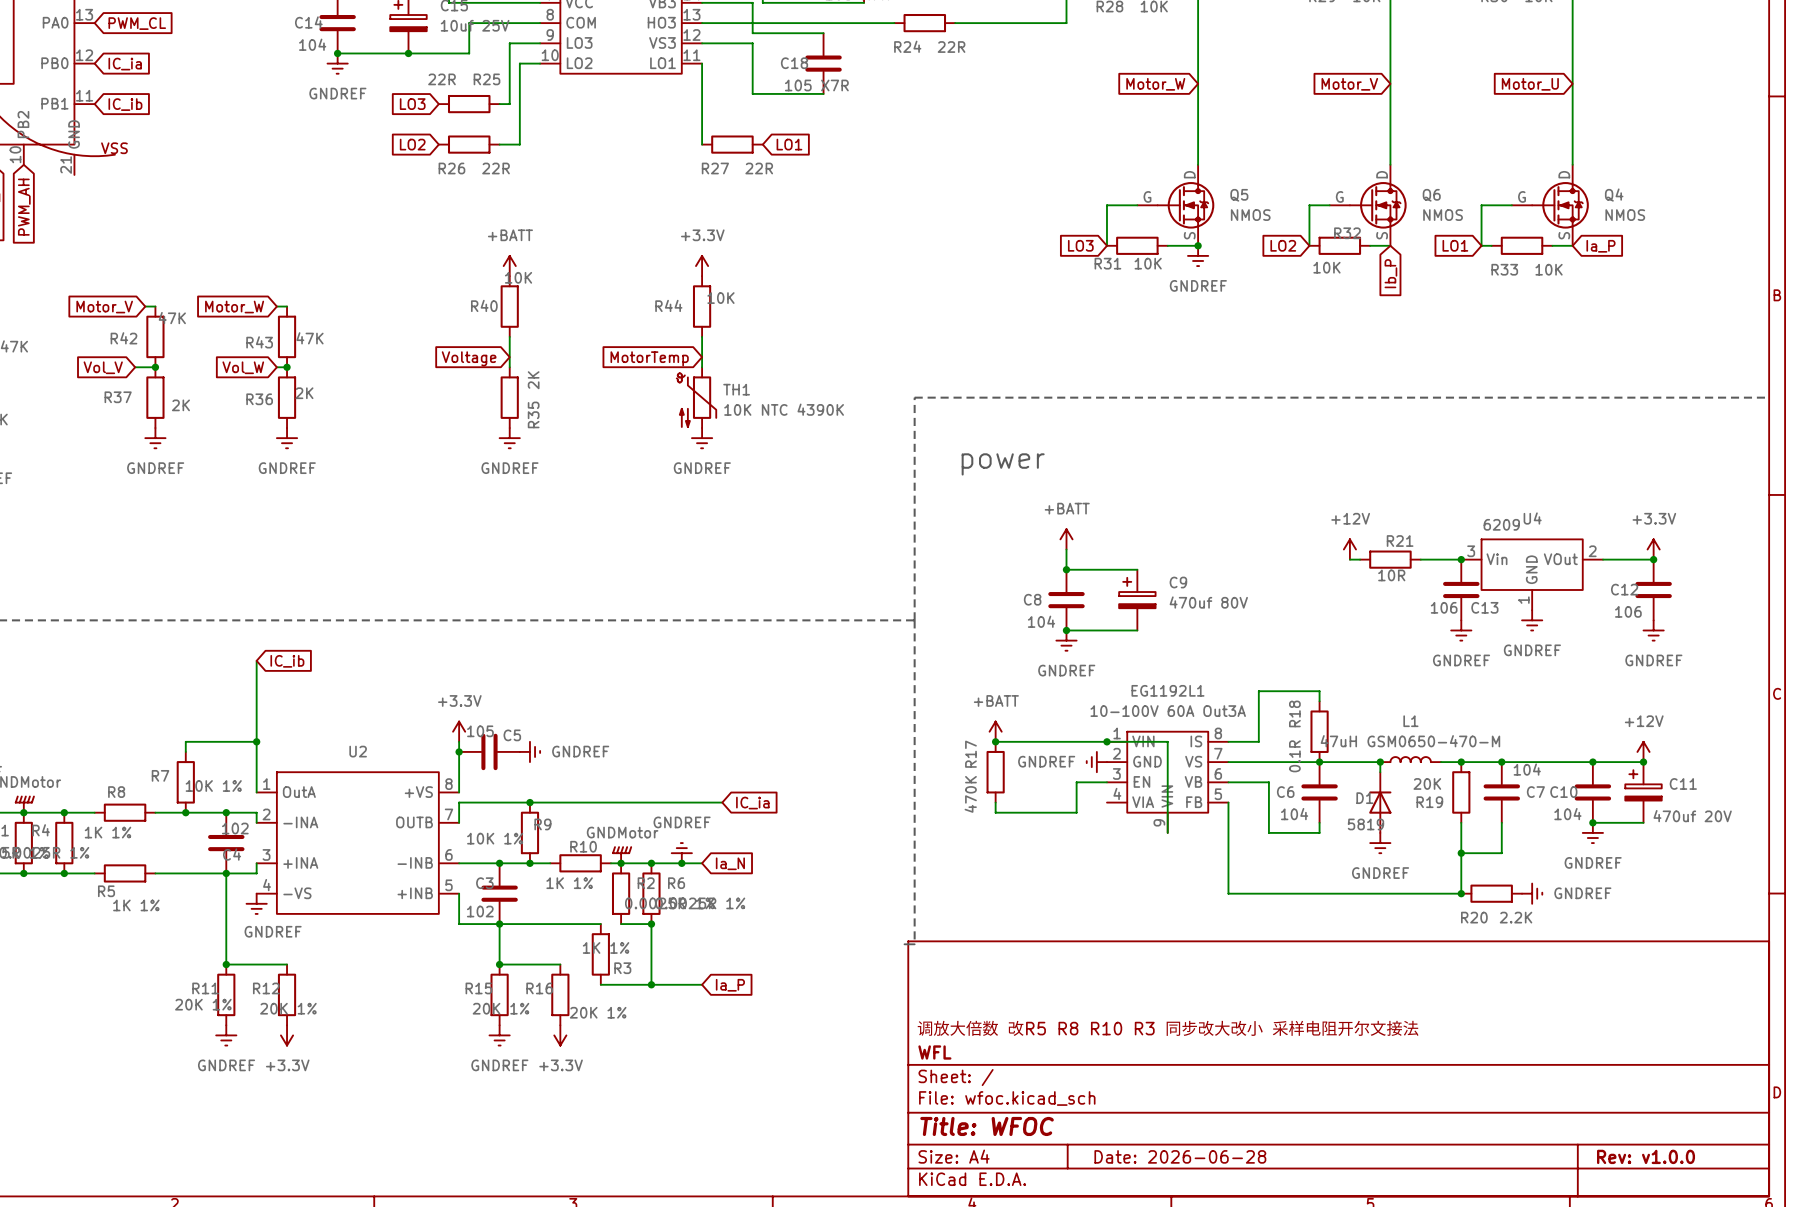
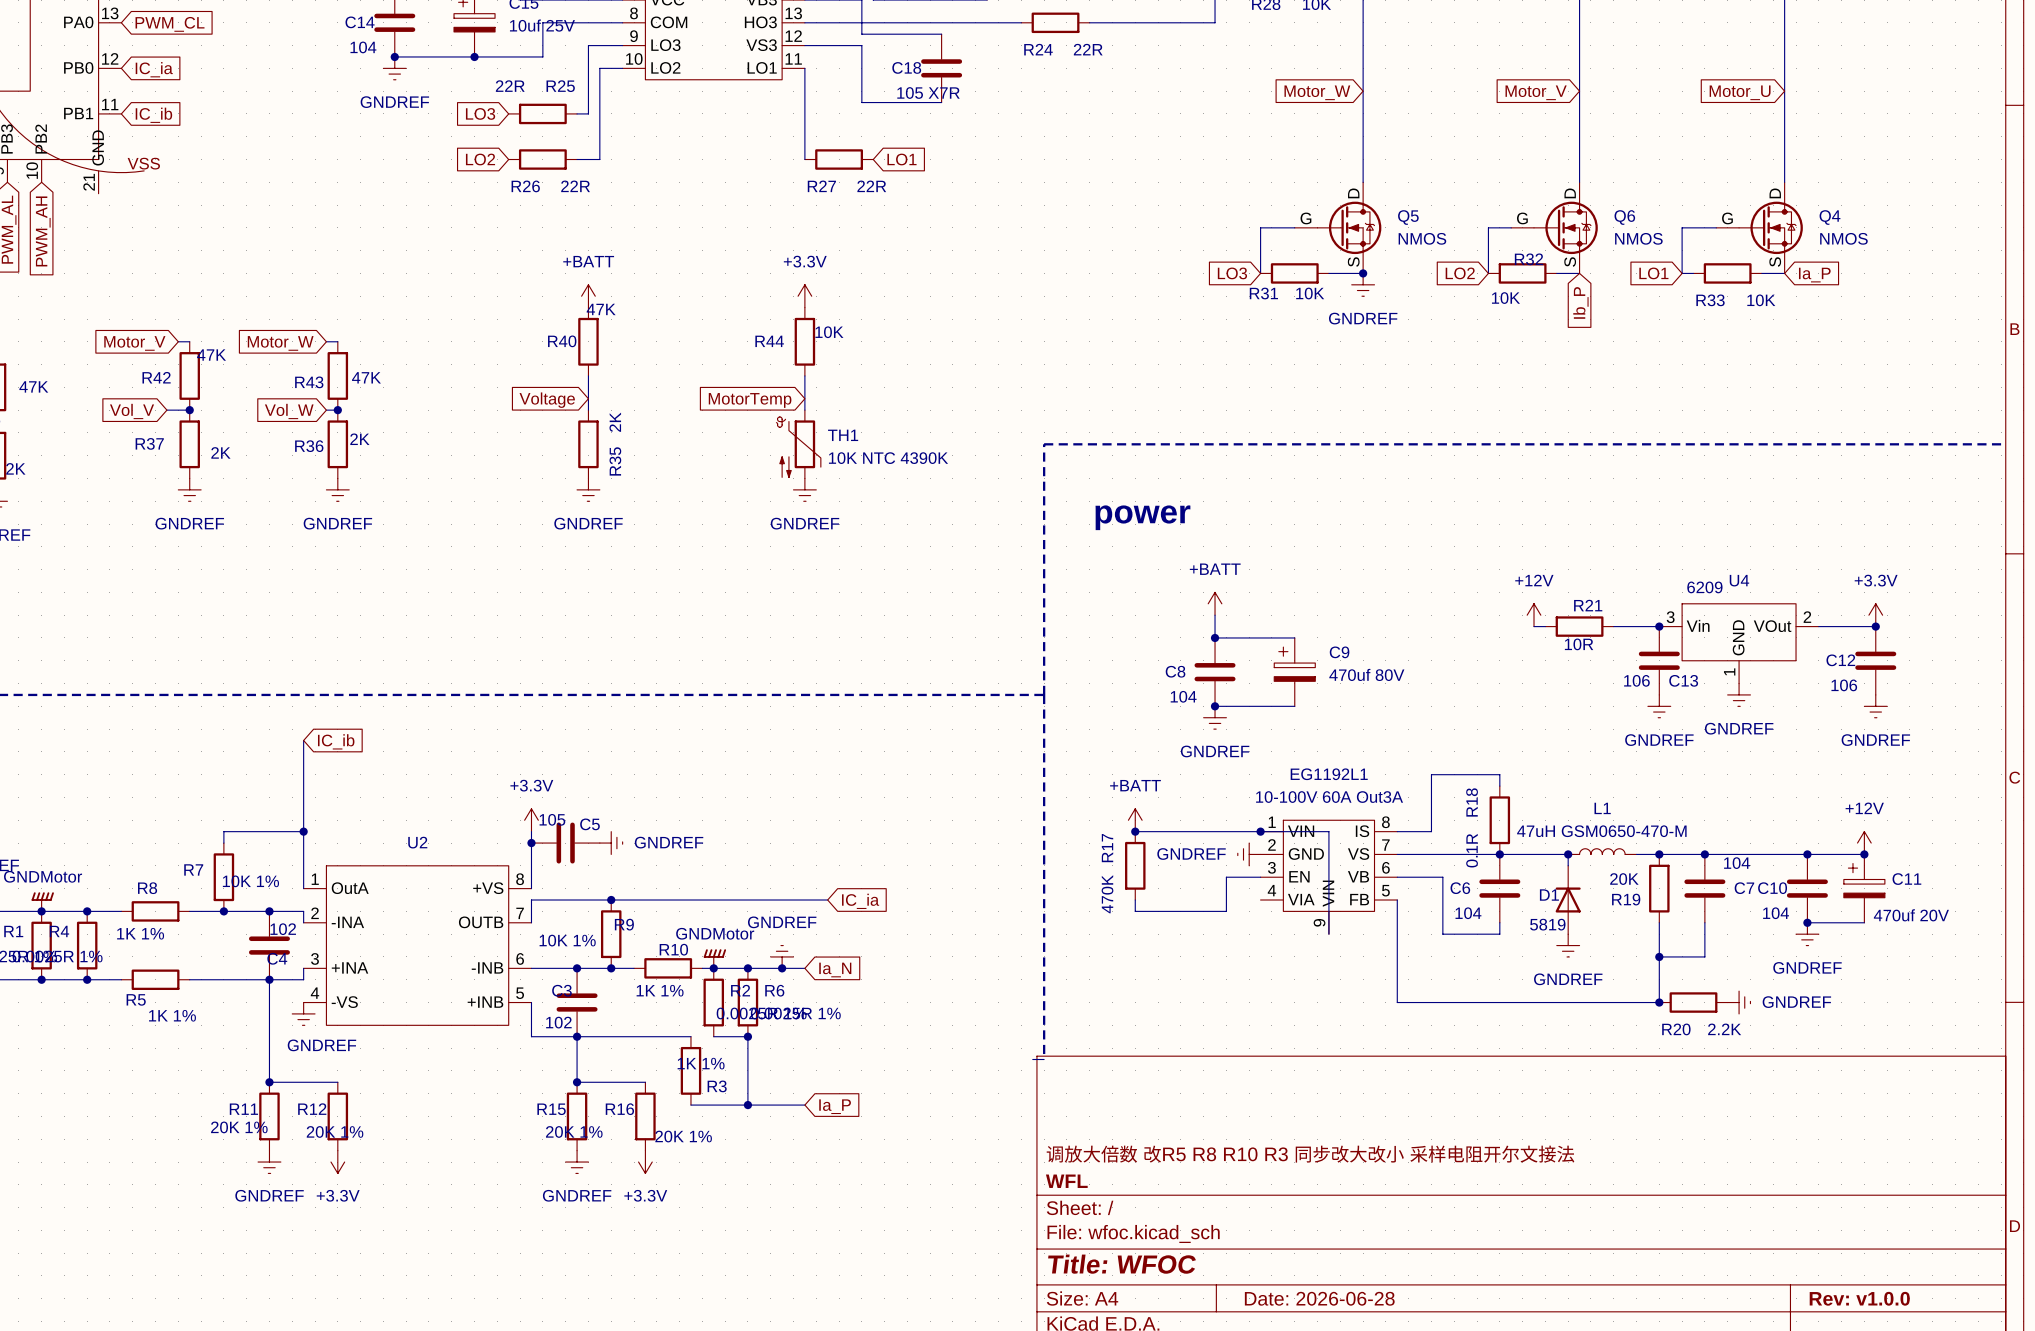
R40 value: 10K (518, 277) -> 47K (601, 309)

